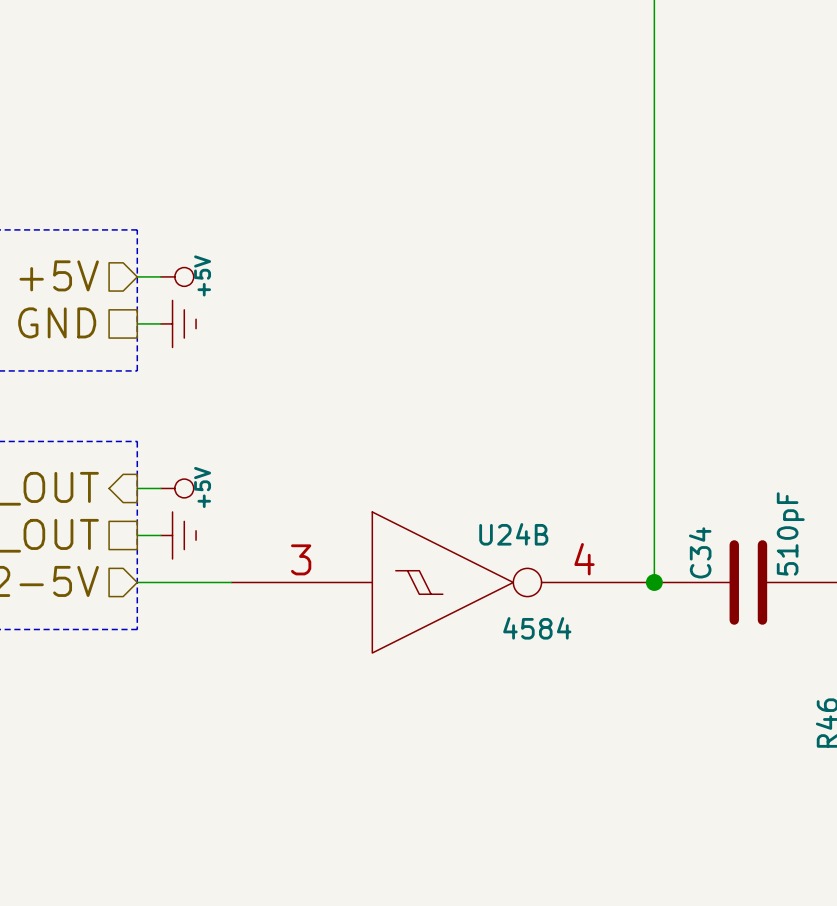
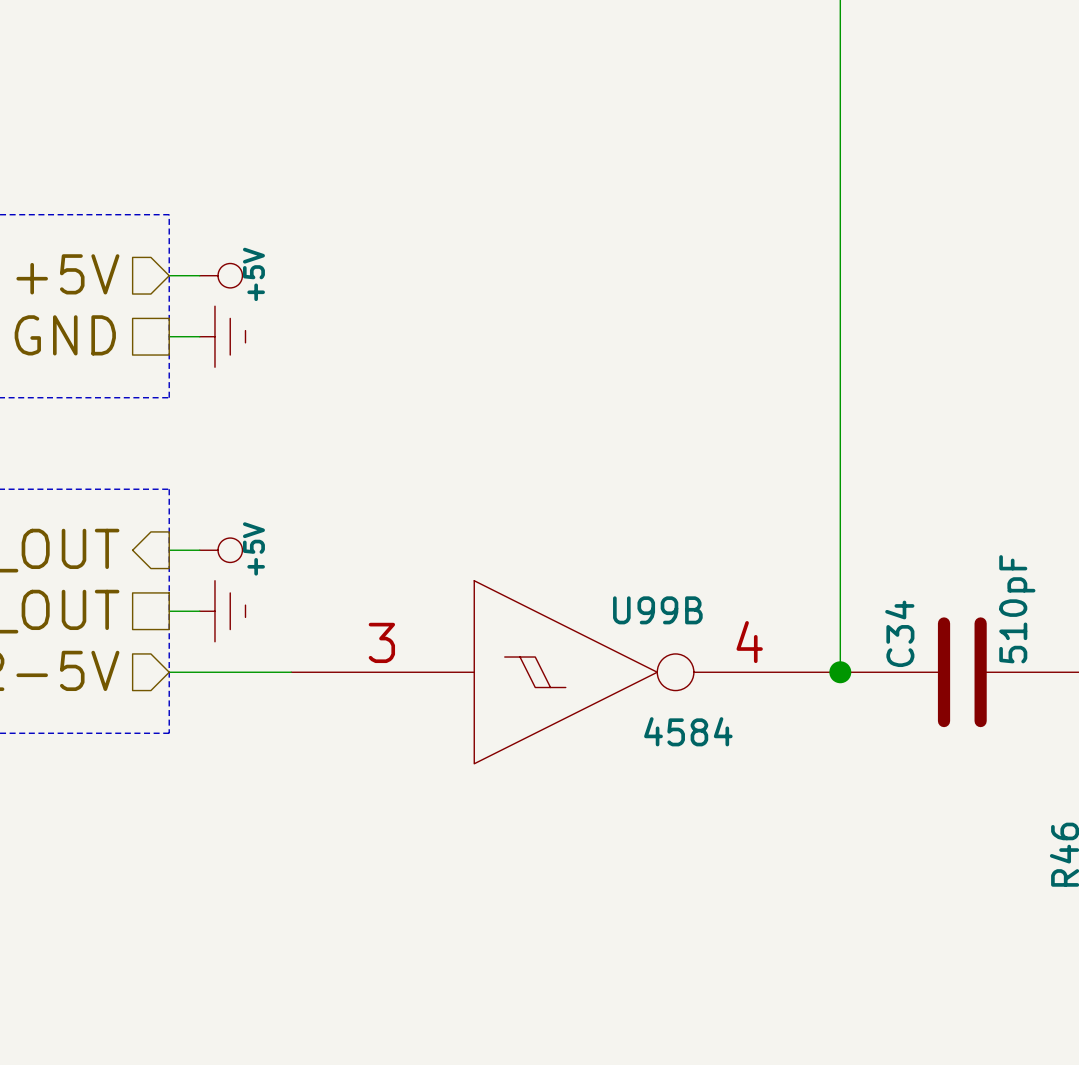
U24B name: U24B (513, 534) -> U99B (657, 610)

